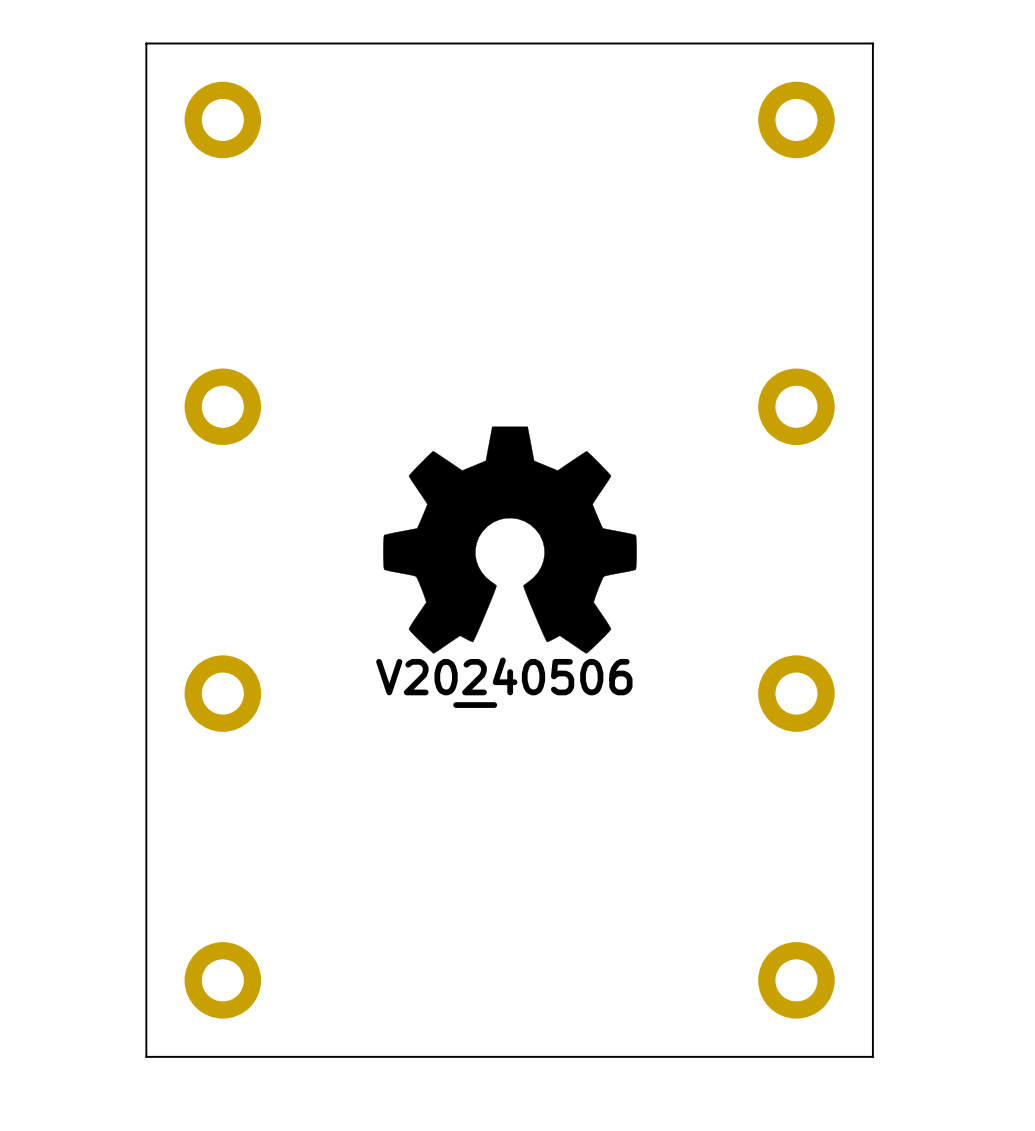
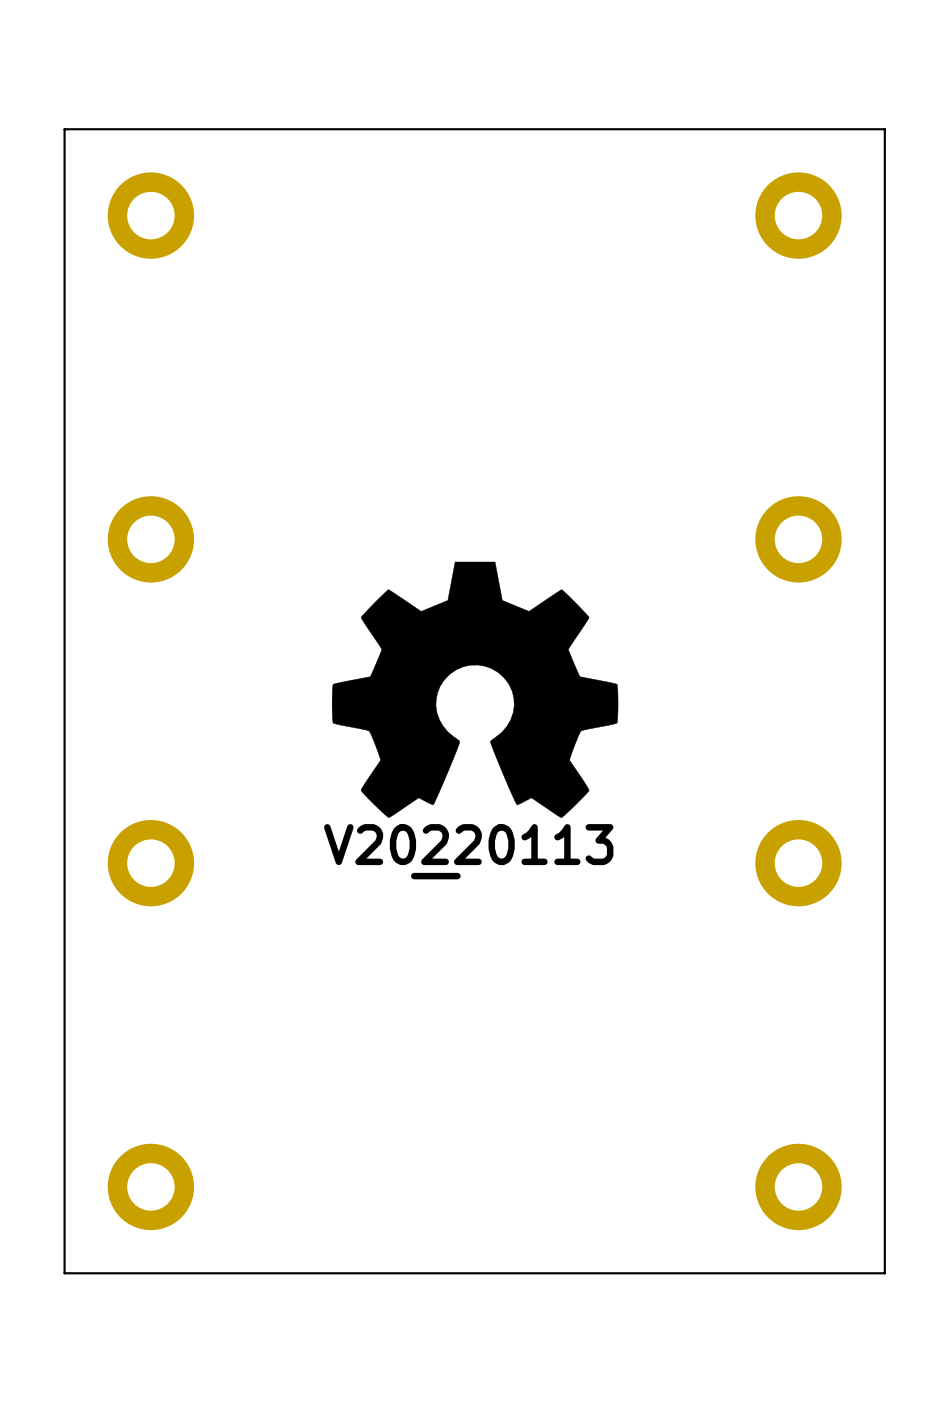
drawing shape: [376, 657, 633, 708] -> [324, 824, 614, 880]

